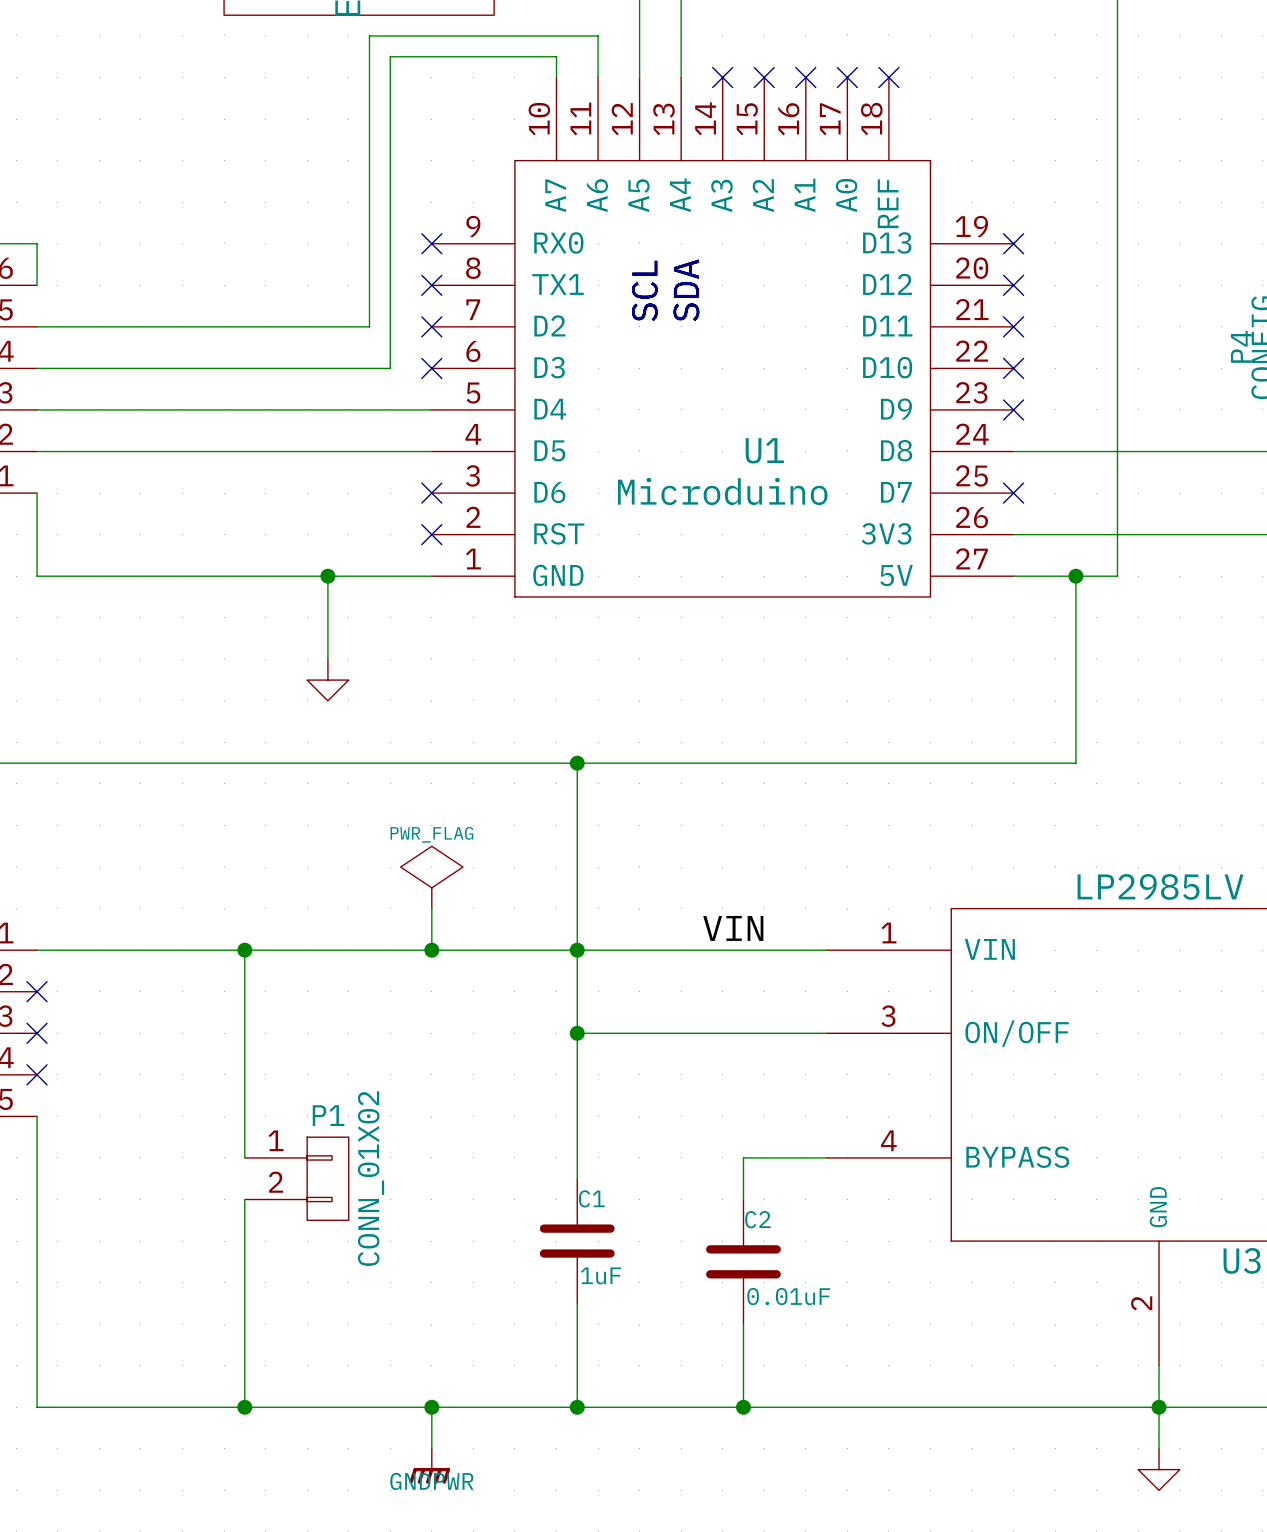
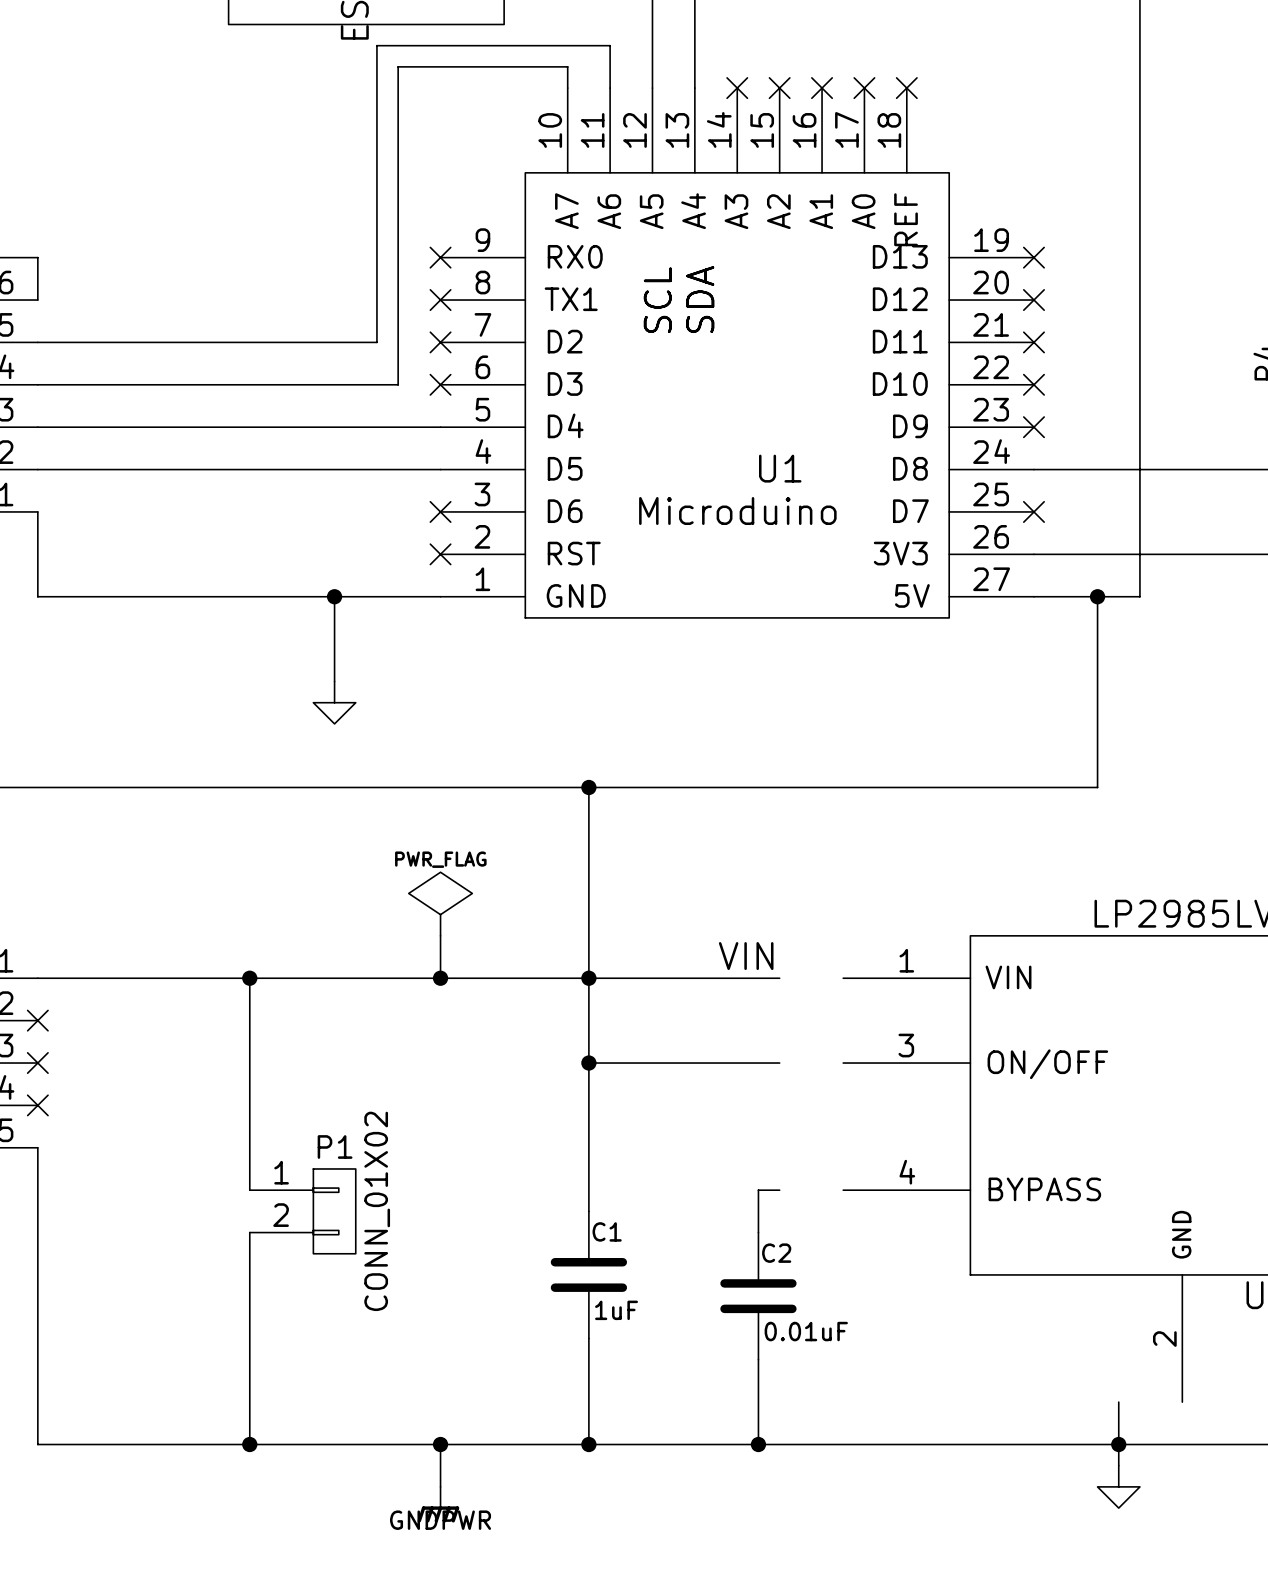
wire: (764, 950) (826, 950) -> none
wire: (764, 1033) (826, 1033) -> none
wire: (764, 1157) (826, 1157) -> none
wire: none -> (1118, 1402) (1118, 1465)
wire: (1159, 1365) (1159, 1448) -> none
junction position: (1159, 1407) -> (1118, 1444)
power symbol position: (1159, 1469) -> (1118, 1486)

